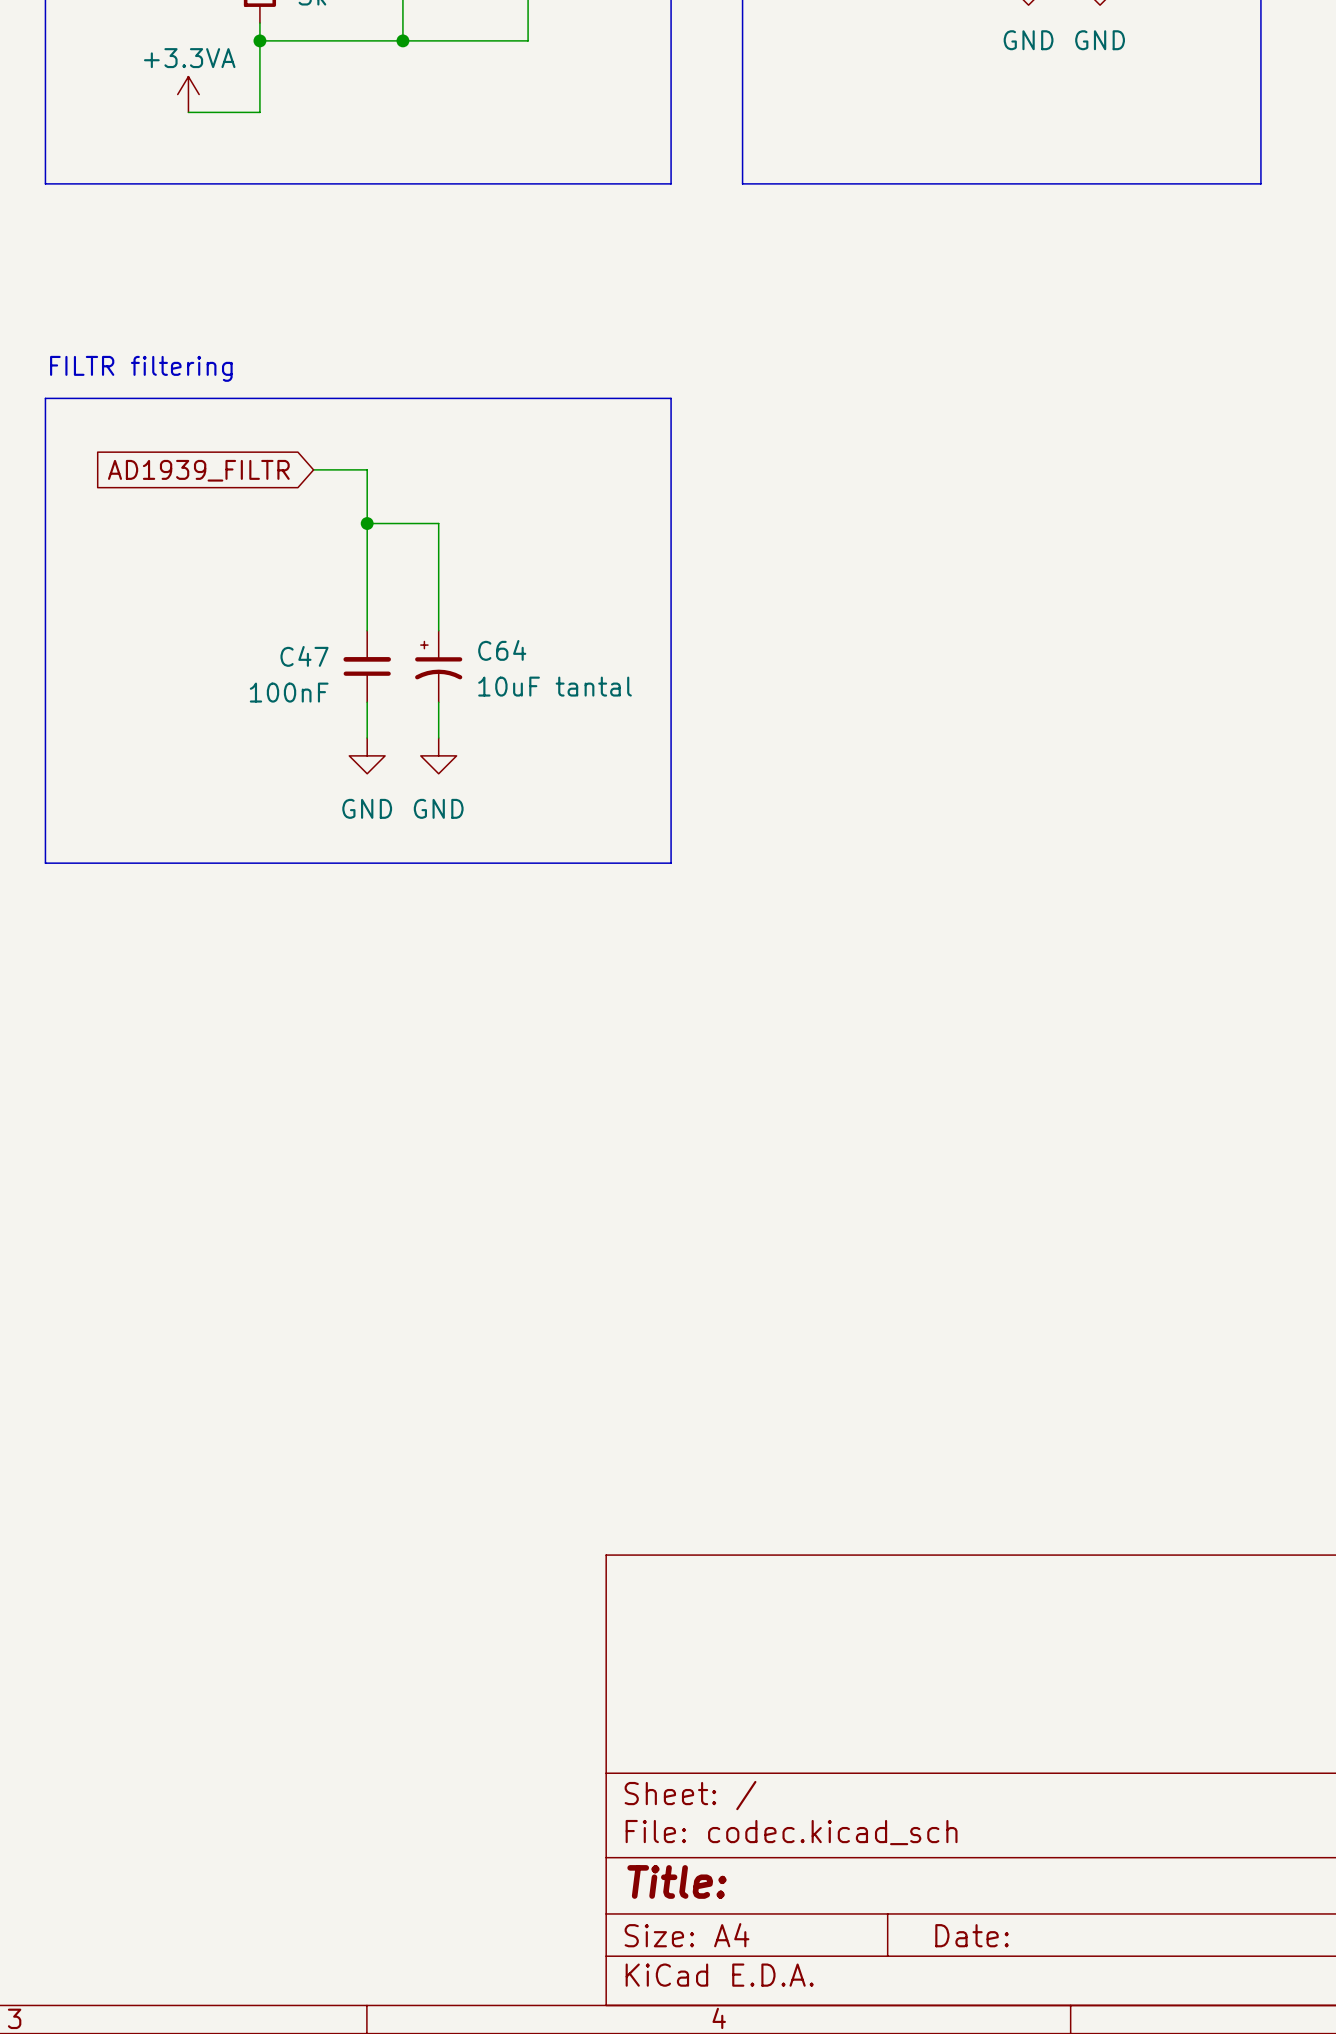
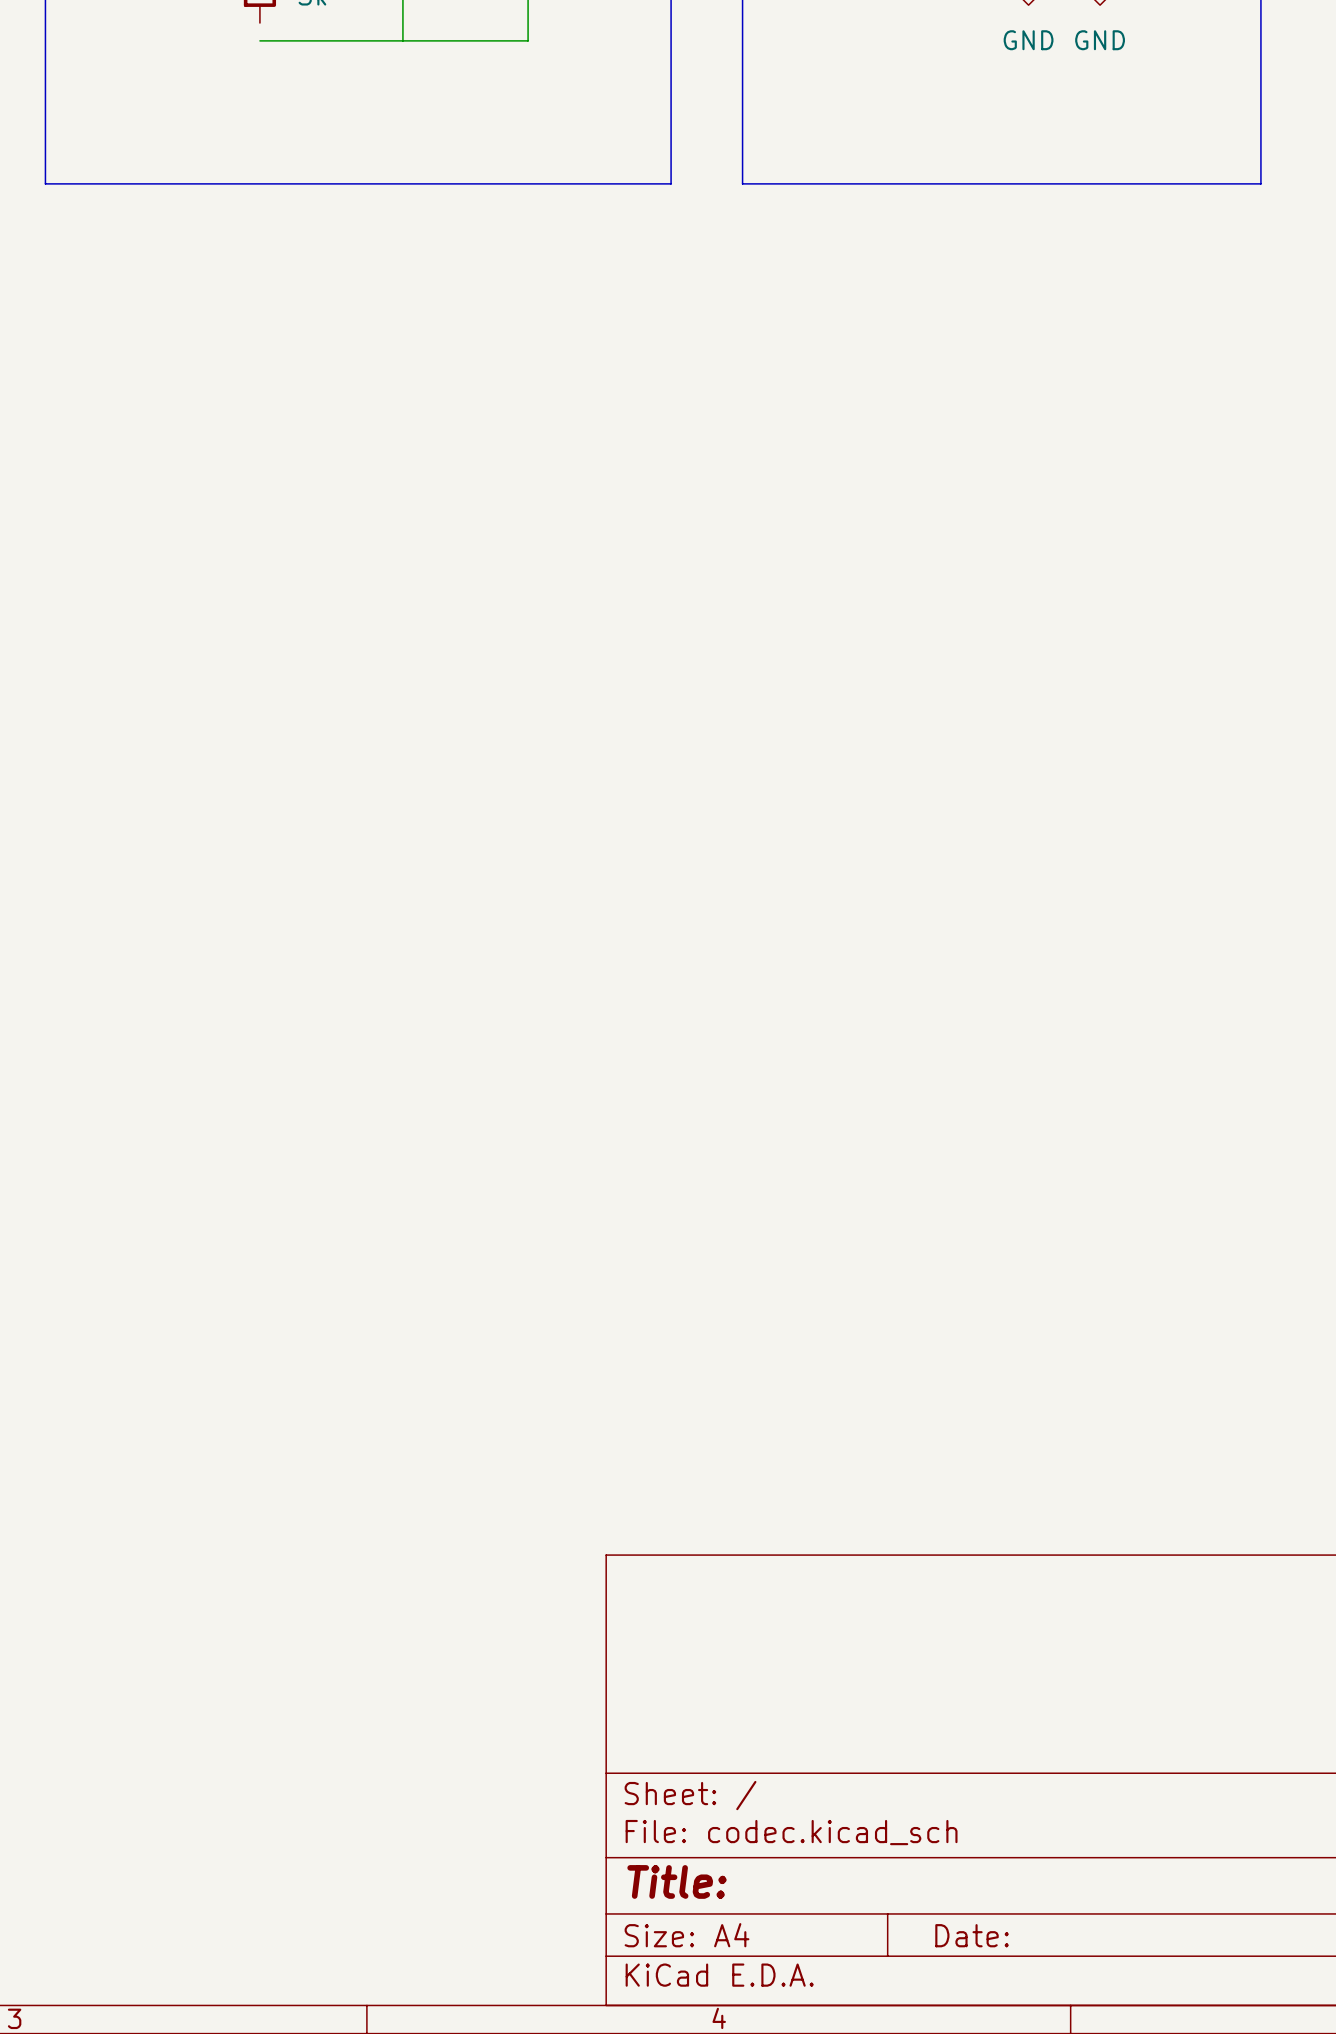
wire: (259, 23) (259, 112) (188, 112) -> none
junction: (259, 40) -> none
junction: (402, 40) -> none
power symbol: +3.3VA (188, 94) -> none
text: FILTR filtering (141, 368) -> none
line: (45, 398) (45, 863) (671, 863) (671, 398) (45, 398) -> none
wire: (313, 469) (367, 469) (367, 630) -> none
global label: AD1939_FILTR (198, 470) -> none
wire: (367, 523) (438, 523) (438, 630) -> none
junction: (367, 523) -> none
C47: 100nF (367, 666) -> none
C64: 10uF tantal (438, 666) -> none
wire: (367, 702) (367, 738) -> none
wire: (438, 702) (438, 738) -> none
power symbol: GND (367, 755) -> none
power symbol: GND (438, 755) -> none

